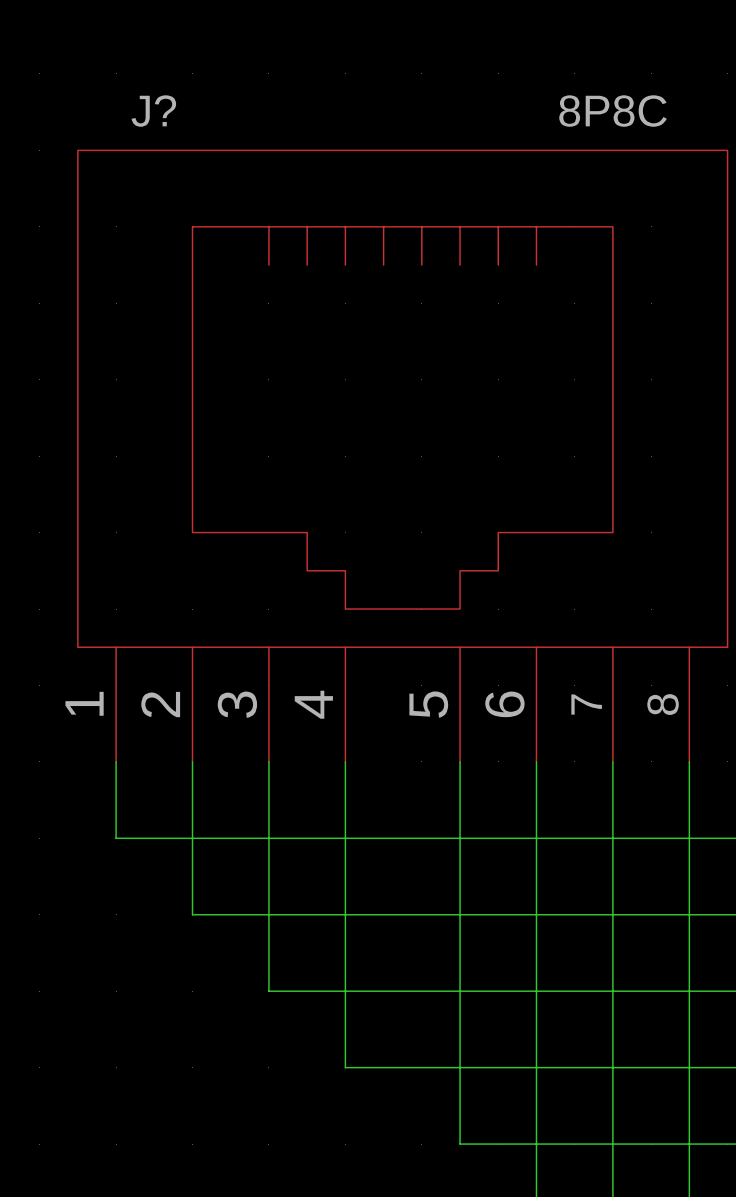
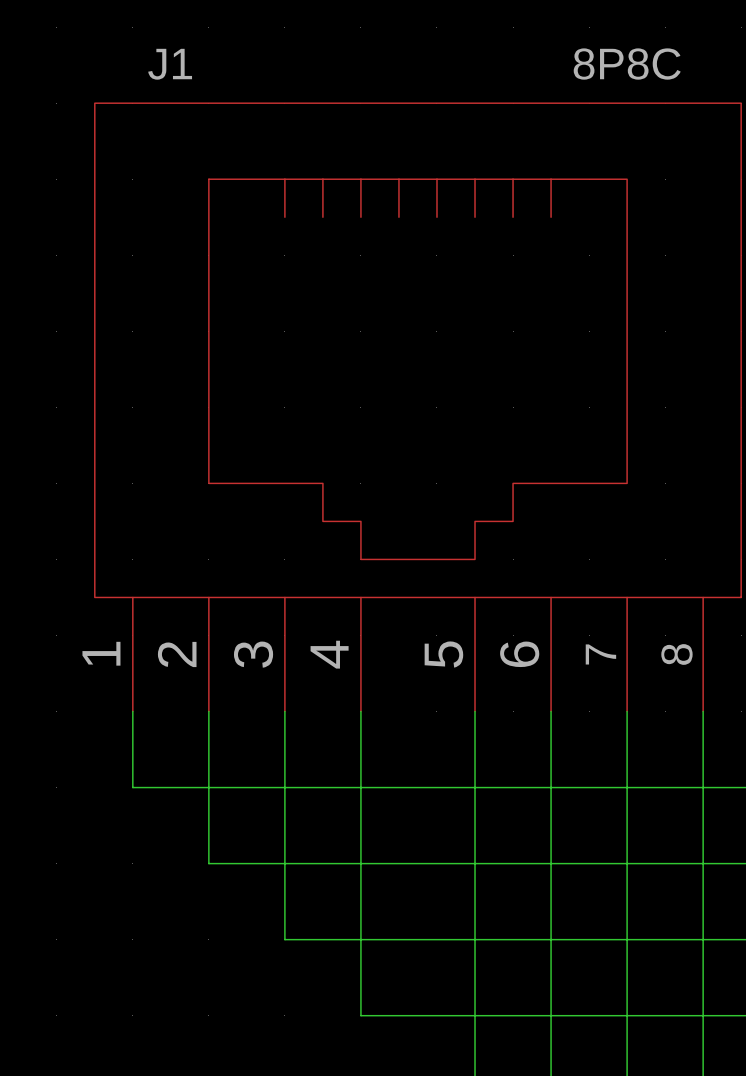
J? name: J? (153, 111) -> J1 (170, 64)

